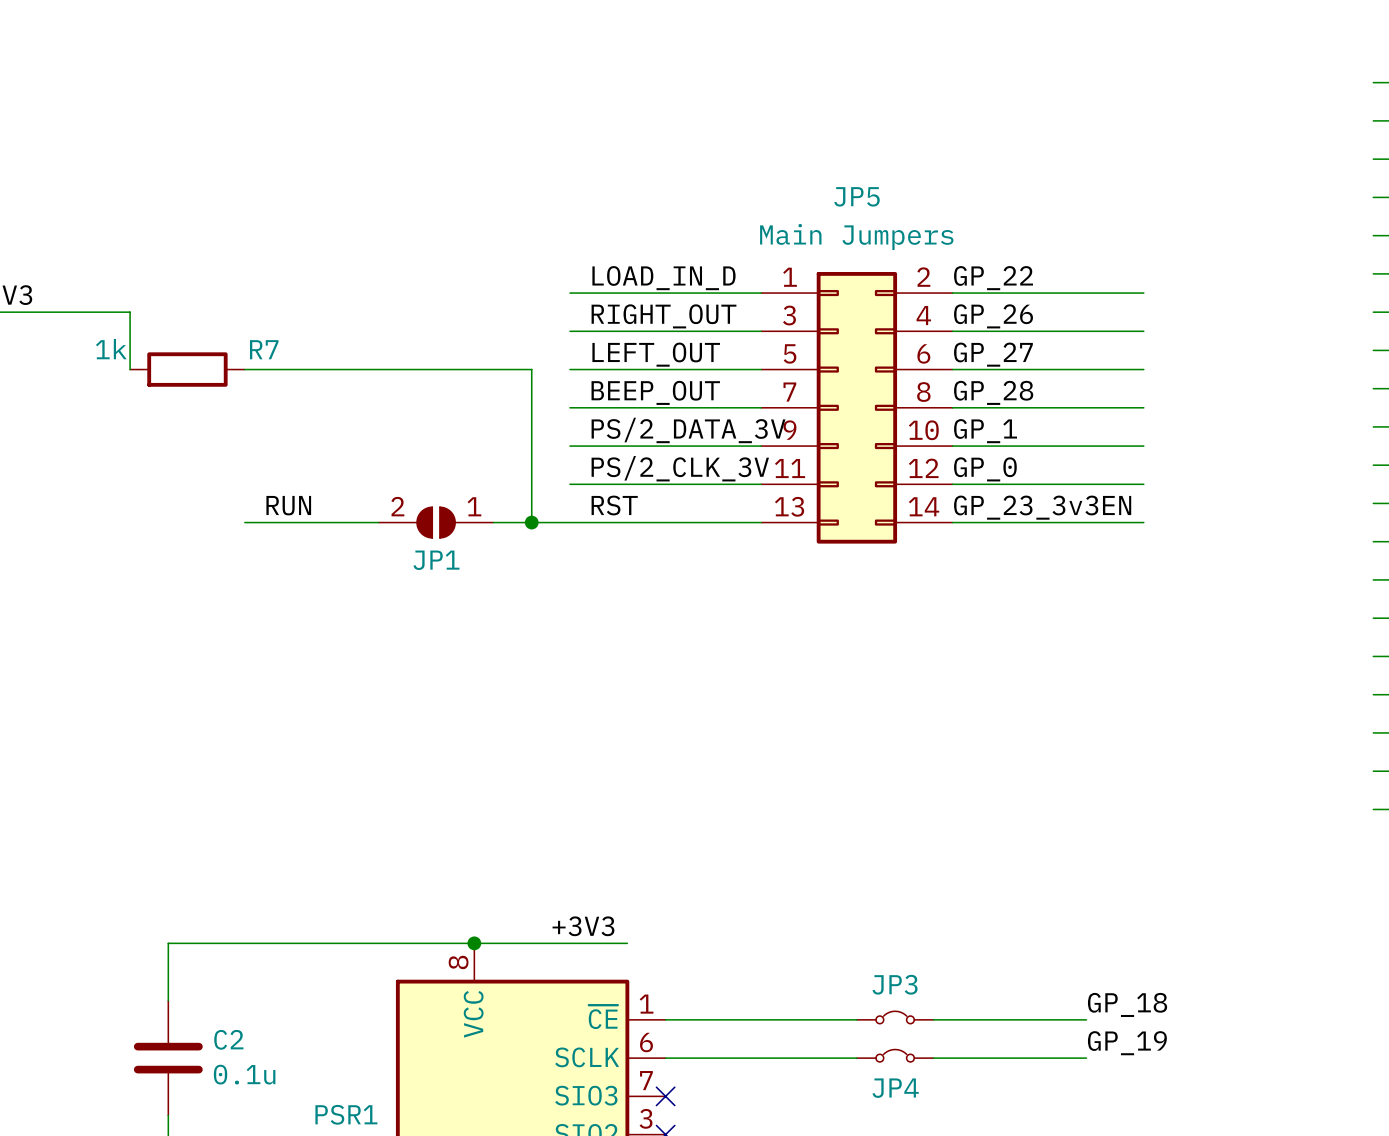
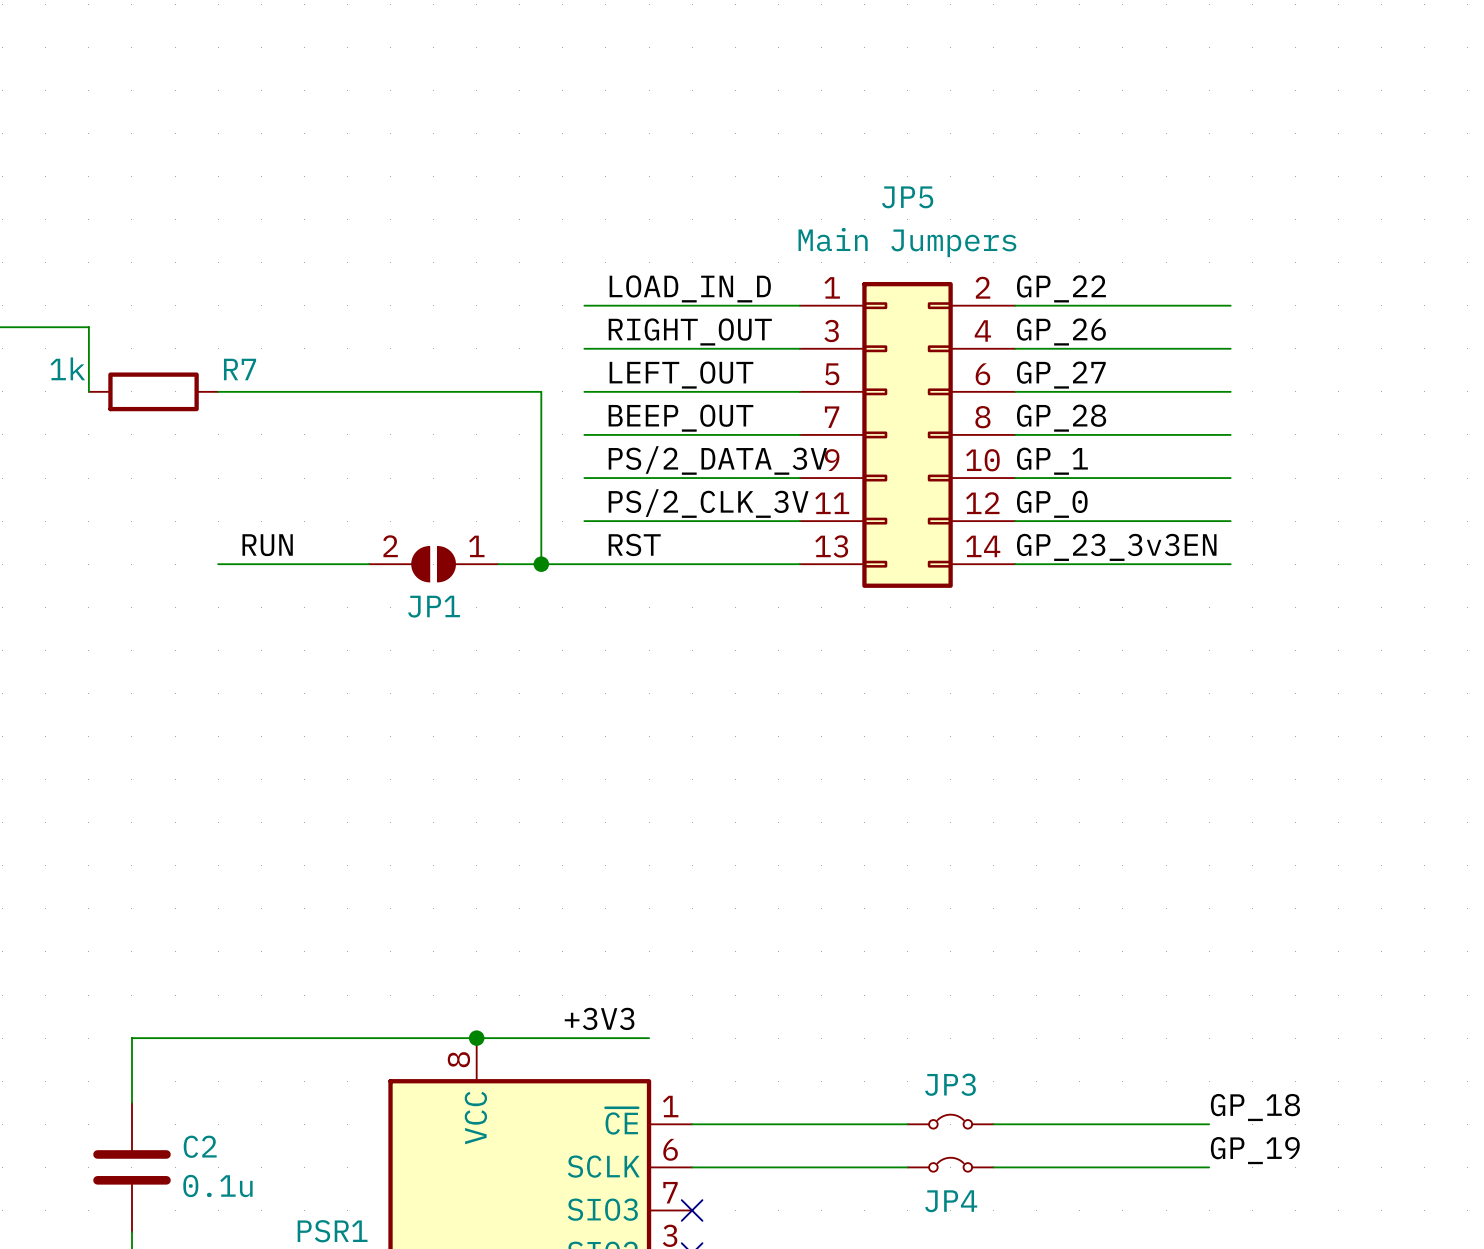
label position: GP_18 (1127, 1004) -> GP_18 (1255, 1107)
wire: none -> (1166, 1124) (1209, 1124)
label position: GP_19 (1127, 1043) -> GP_19 (1255, 1150)
wire: none -> (1166, 1167) (1209, 1167)

